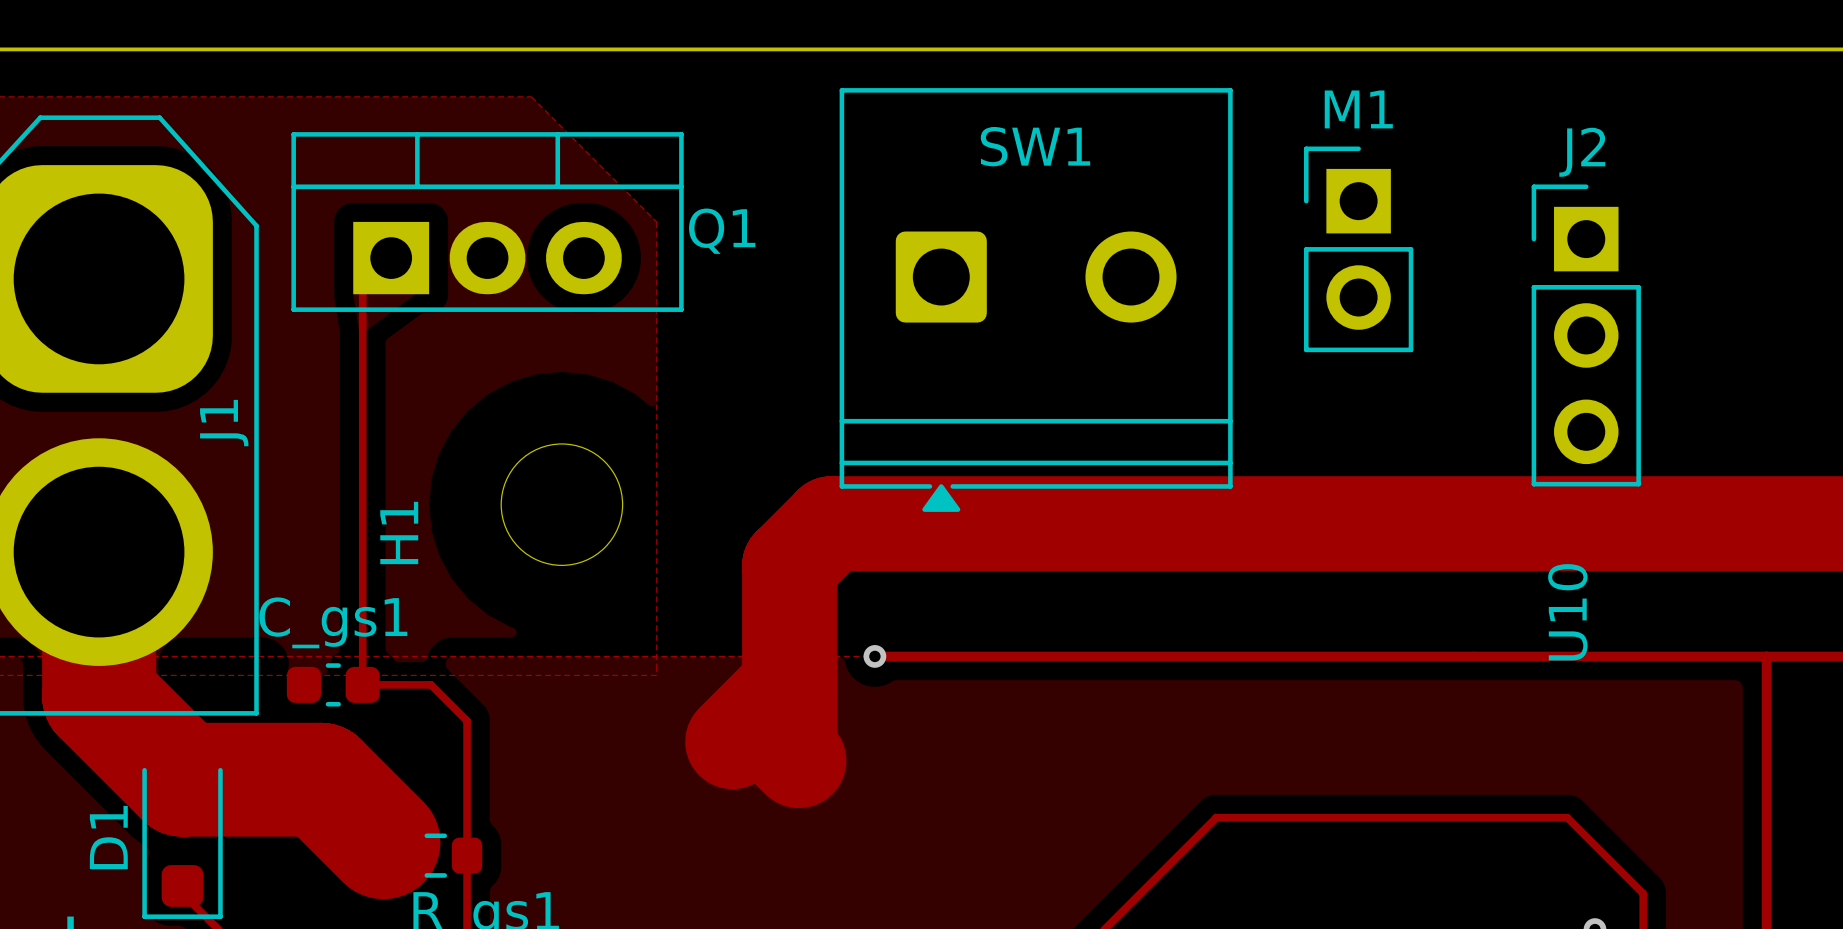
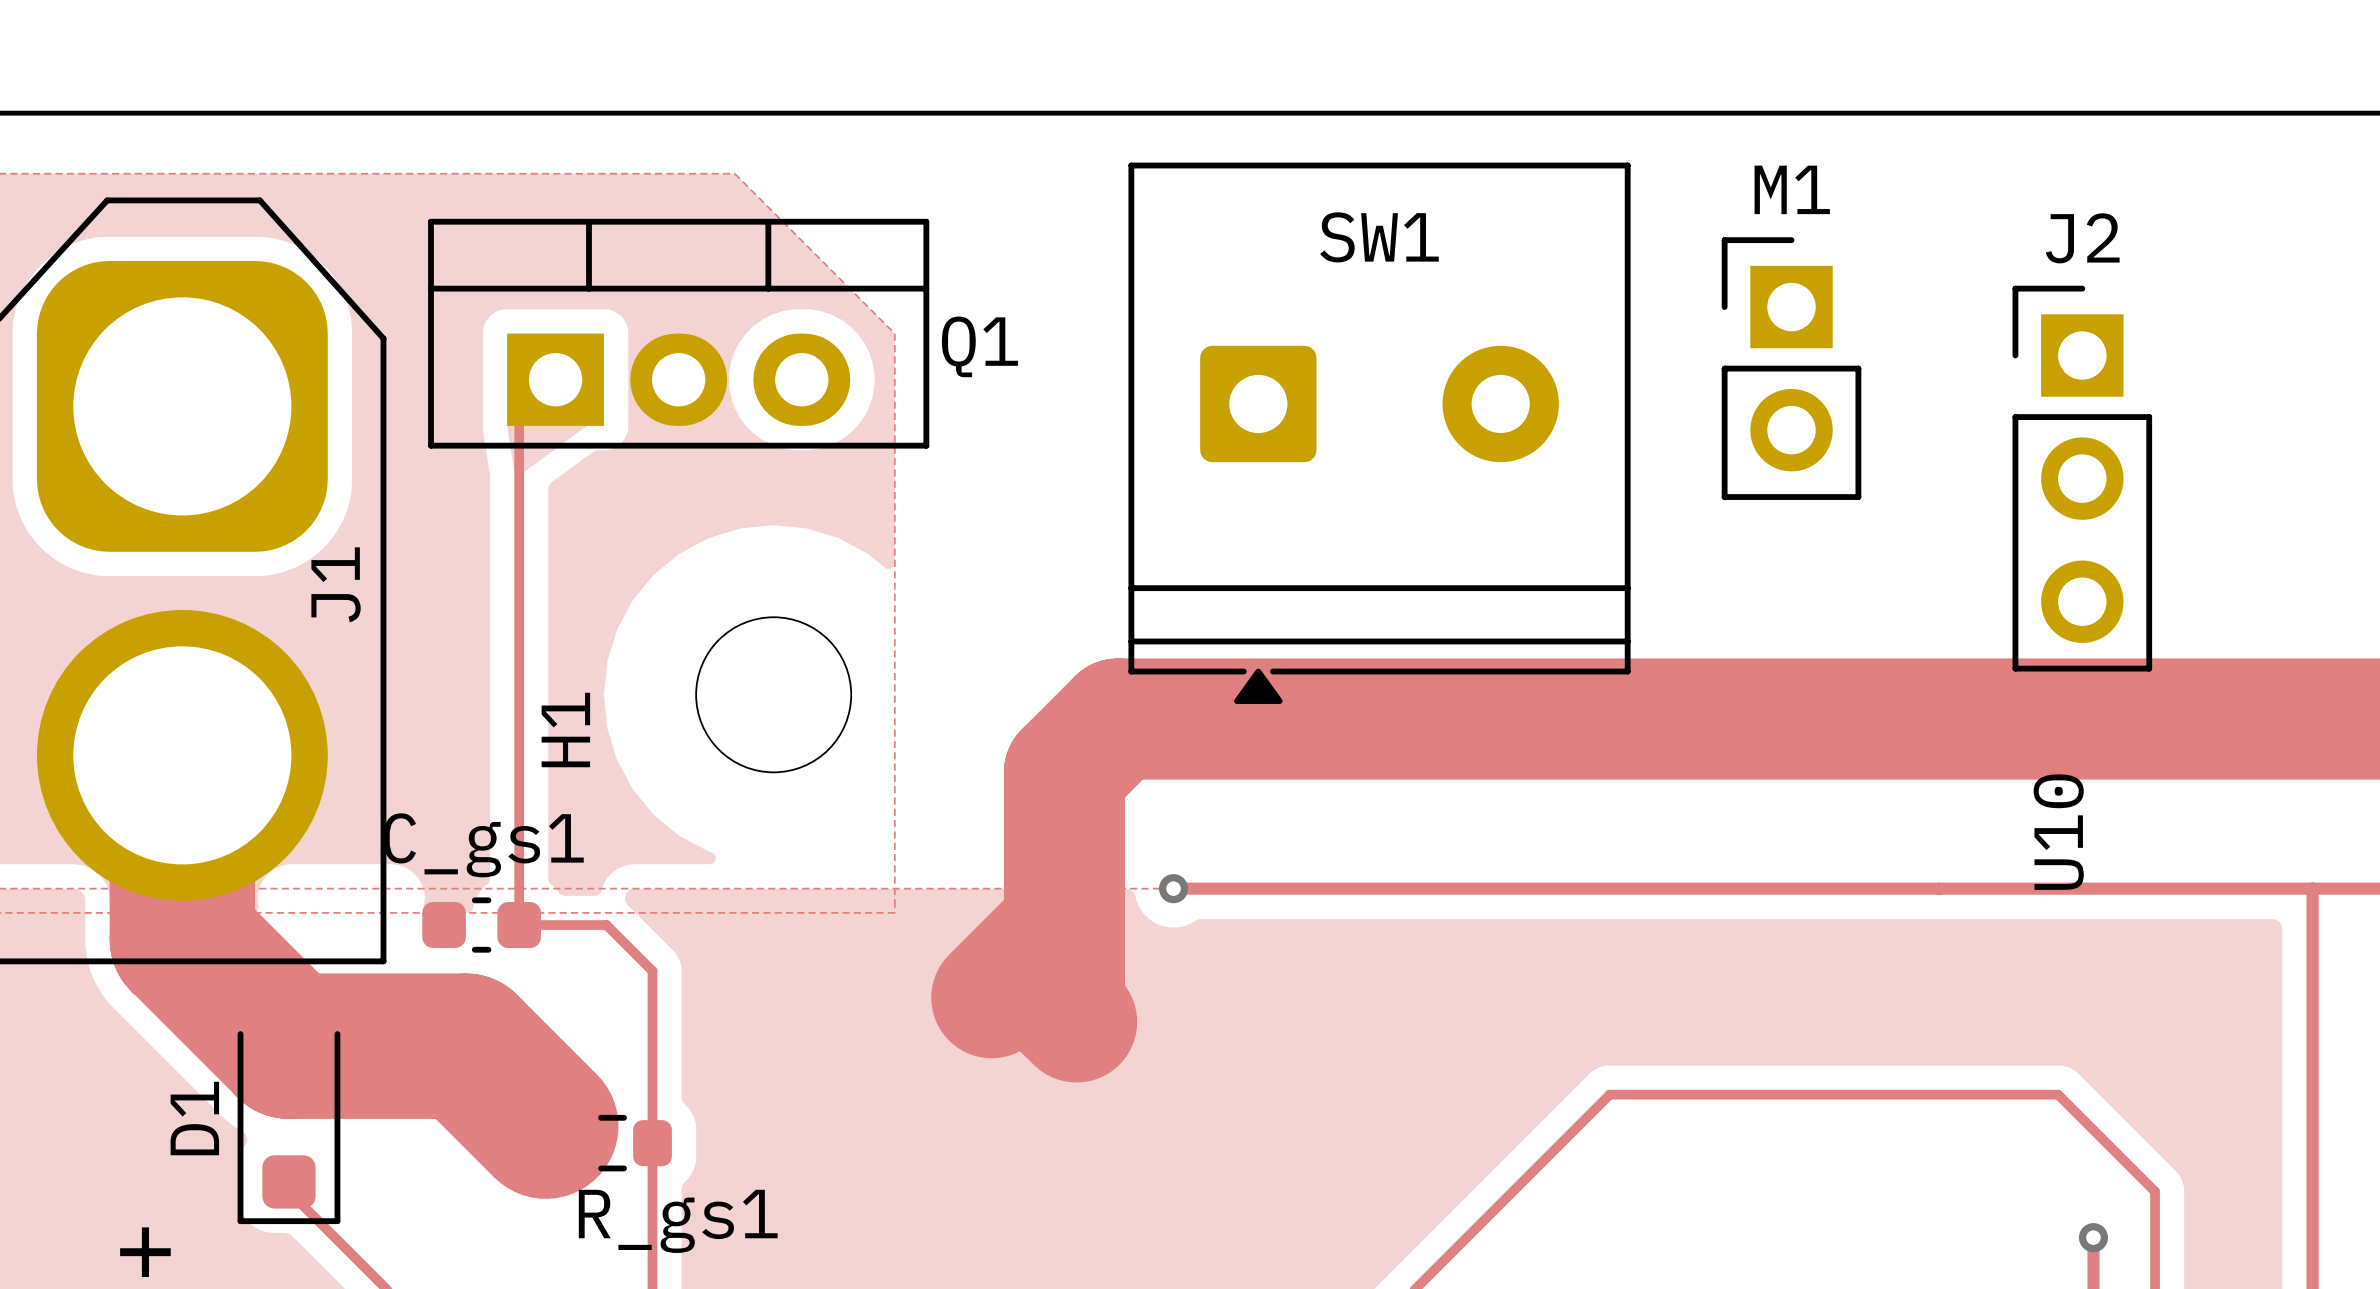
SW1 footprint: [839, 88, 1233, 512] -> [1128, 162, 1631, 705]

